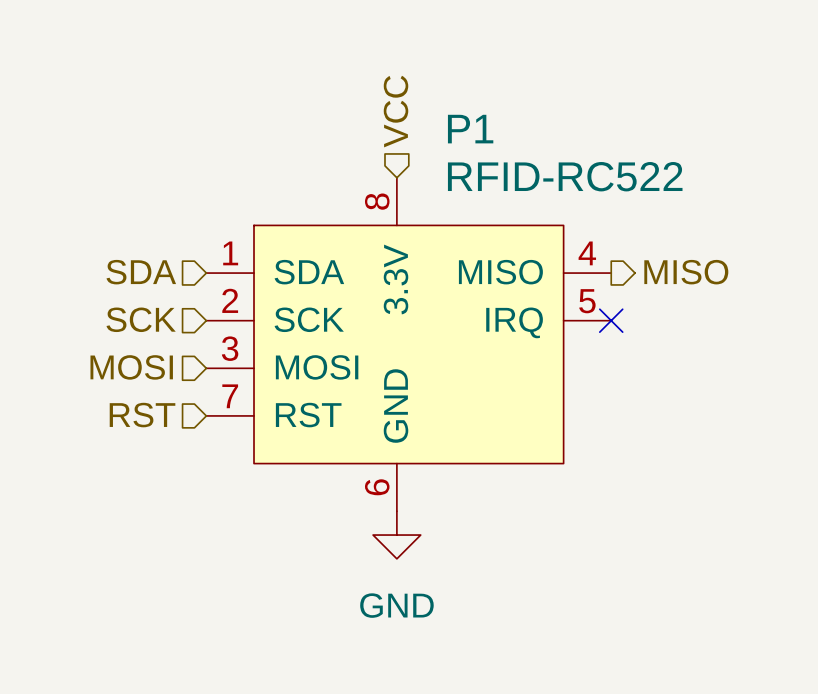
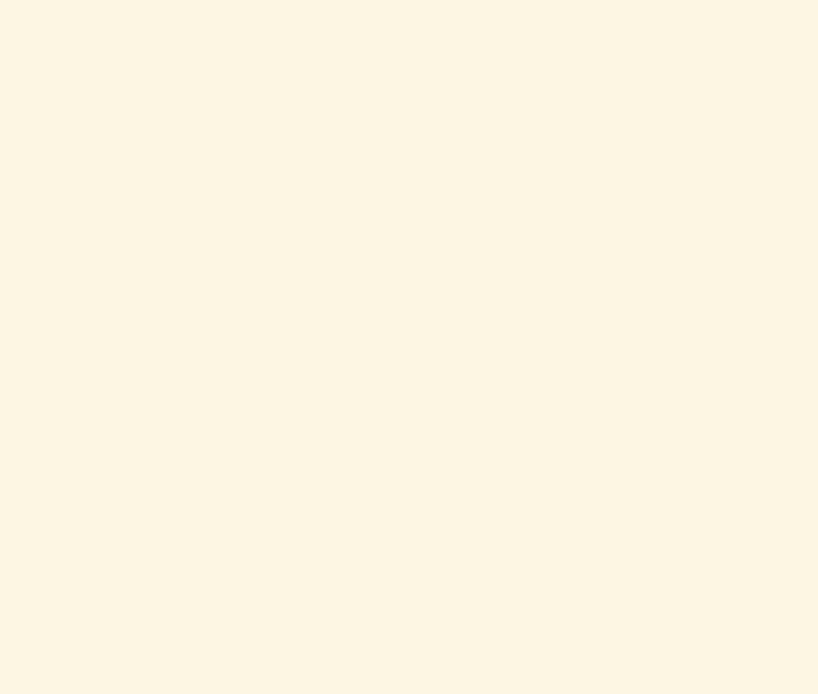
hierarchical label: VCC (396, 111) -> none
hierarchical label: SDA (141, 272) -> none
hierarchical label: MISO (686, 272) -> none
hierarchical label: SCK (141, 319) -> none
no-connect mark: (611, 320) -> none
P1: RFID-RC522 (408, 344) -> none
hierarchical label: MOSI (131, 367) -> none
hierarchical label: RST (142, 415) -> none
power symbol: GND (396, 535) -> none

